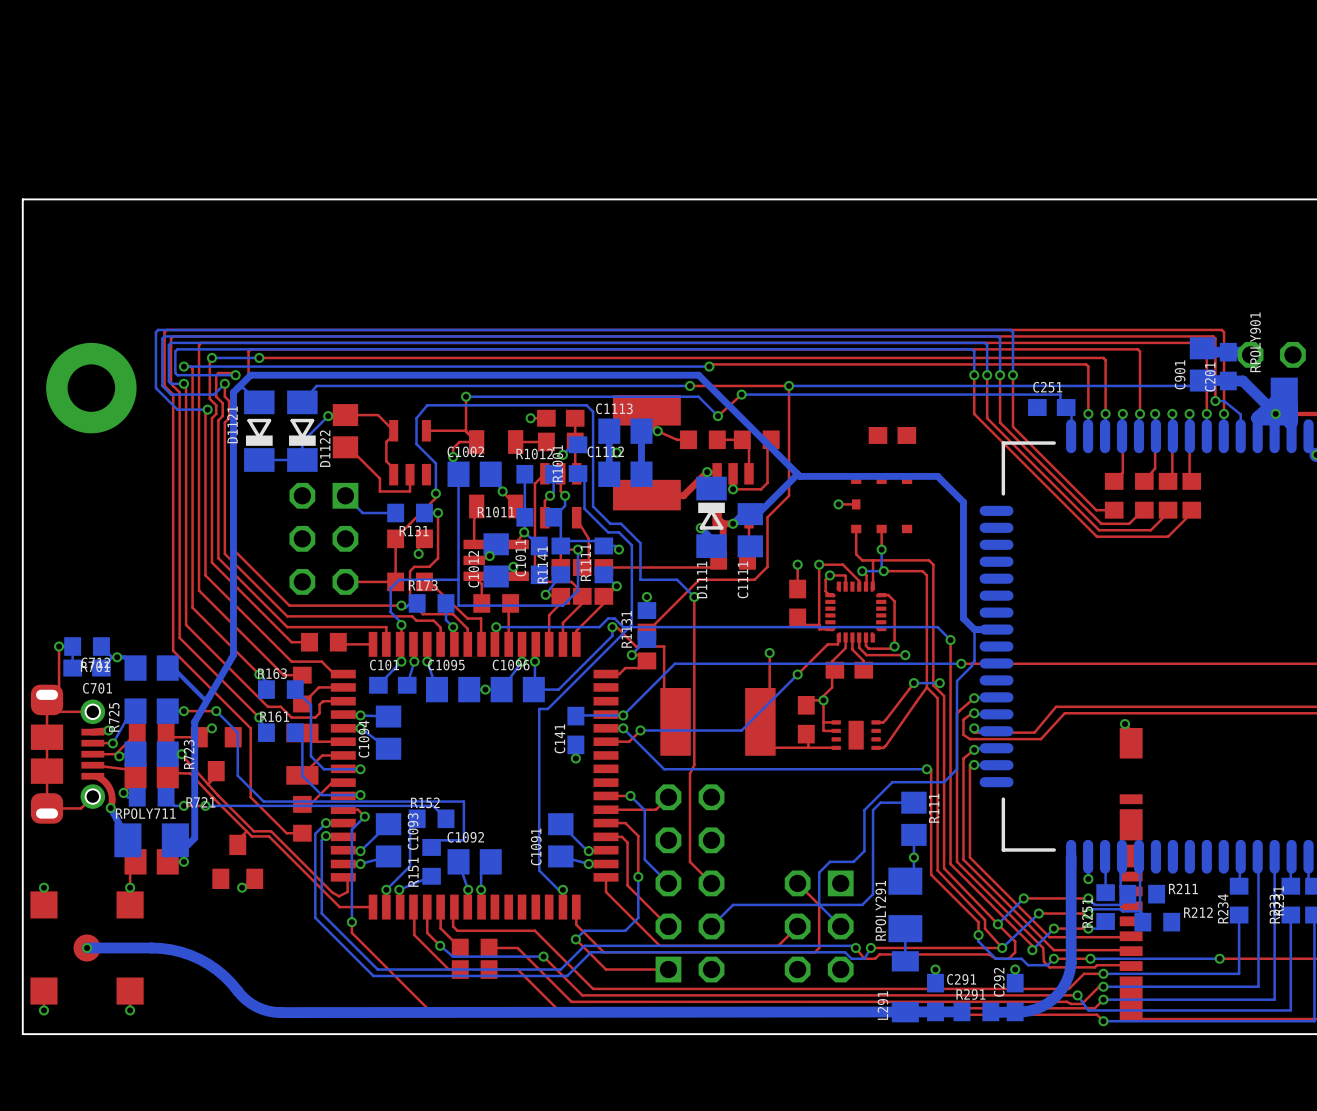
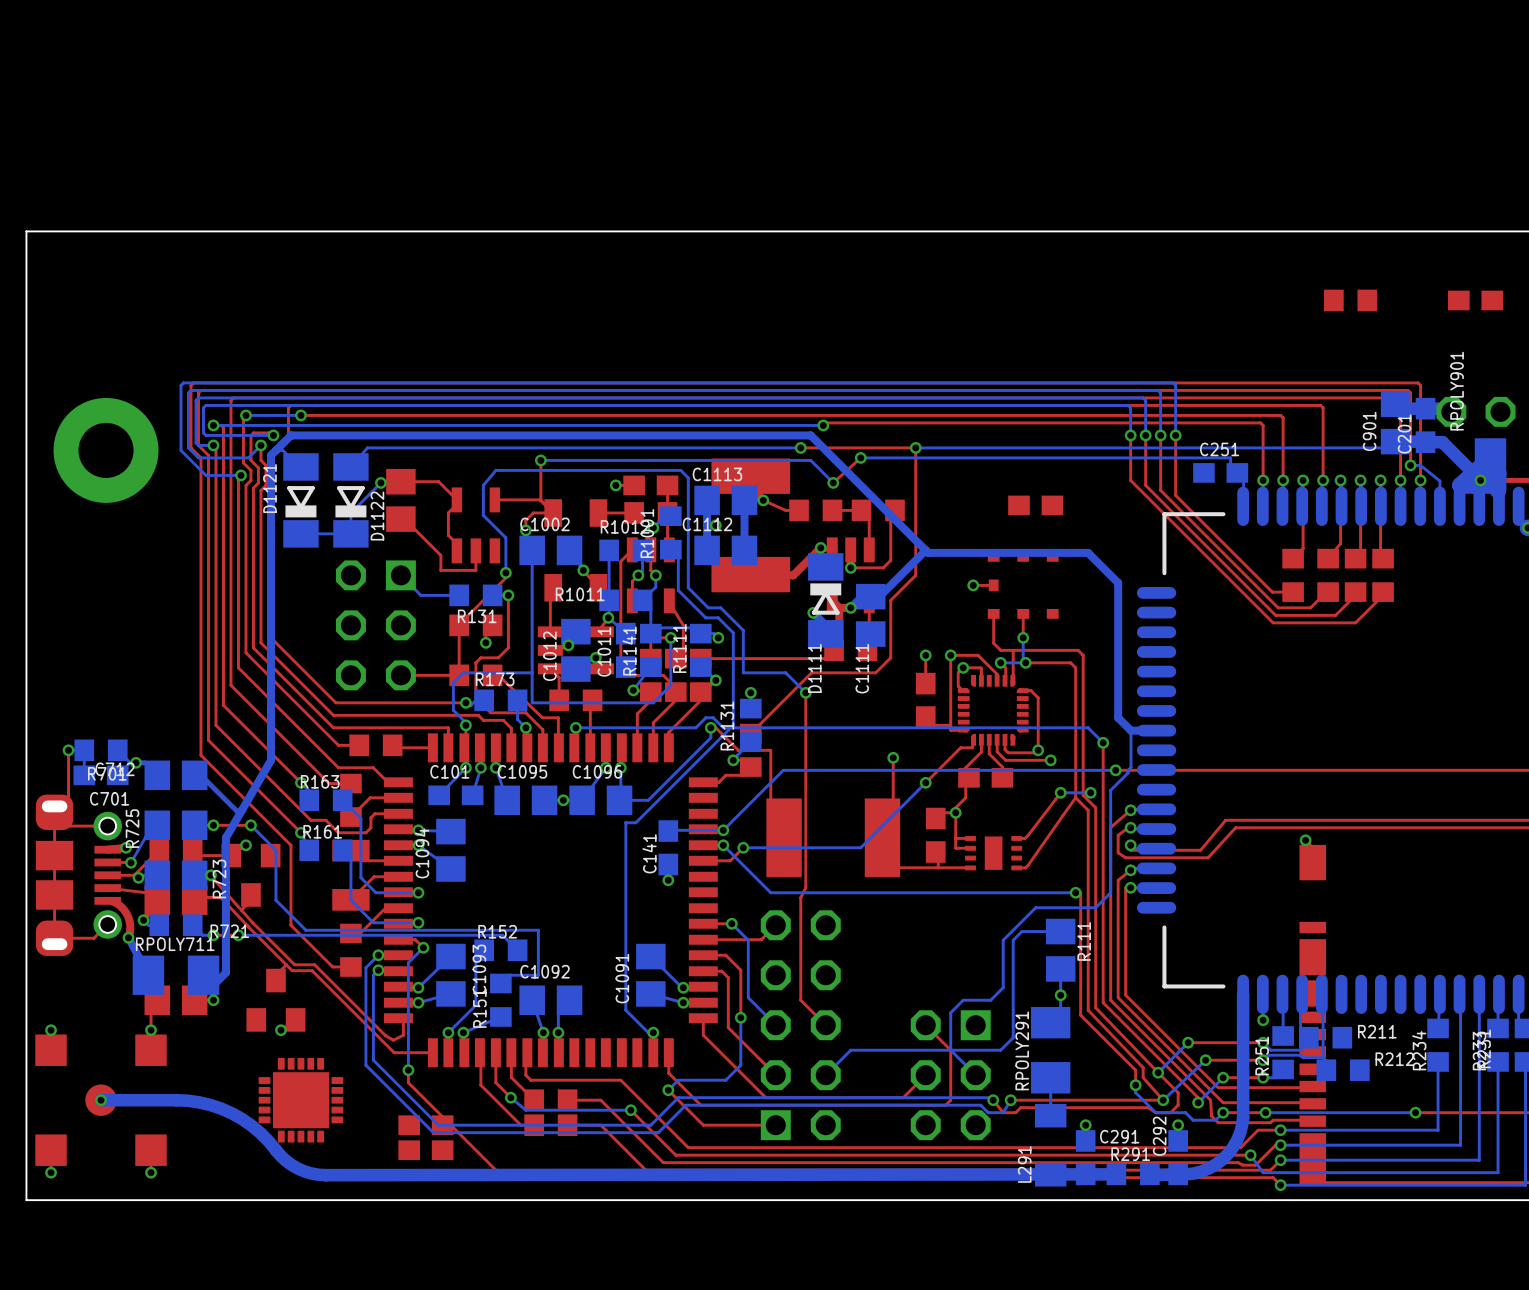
part: none -> (1350, 300)
part: none -> (1475, 300)
part: none -> (300, 1100)
part: none -> (425, 1125)
part: none -> (425, 1150)

